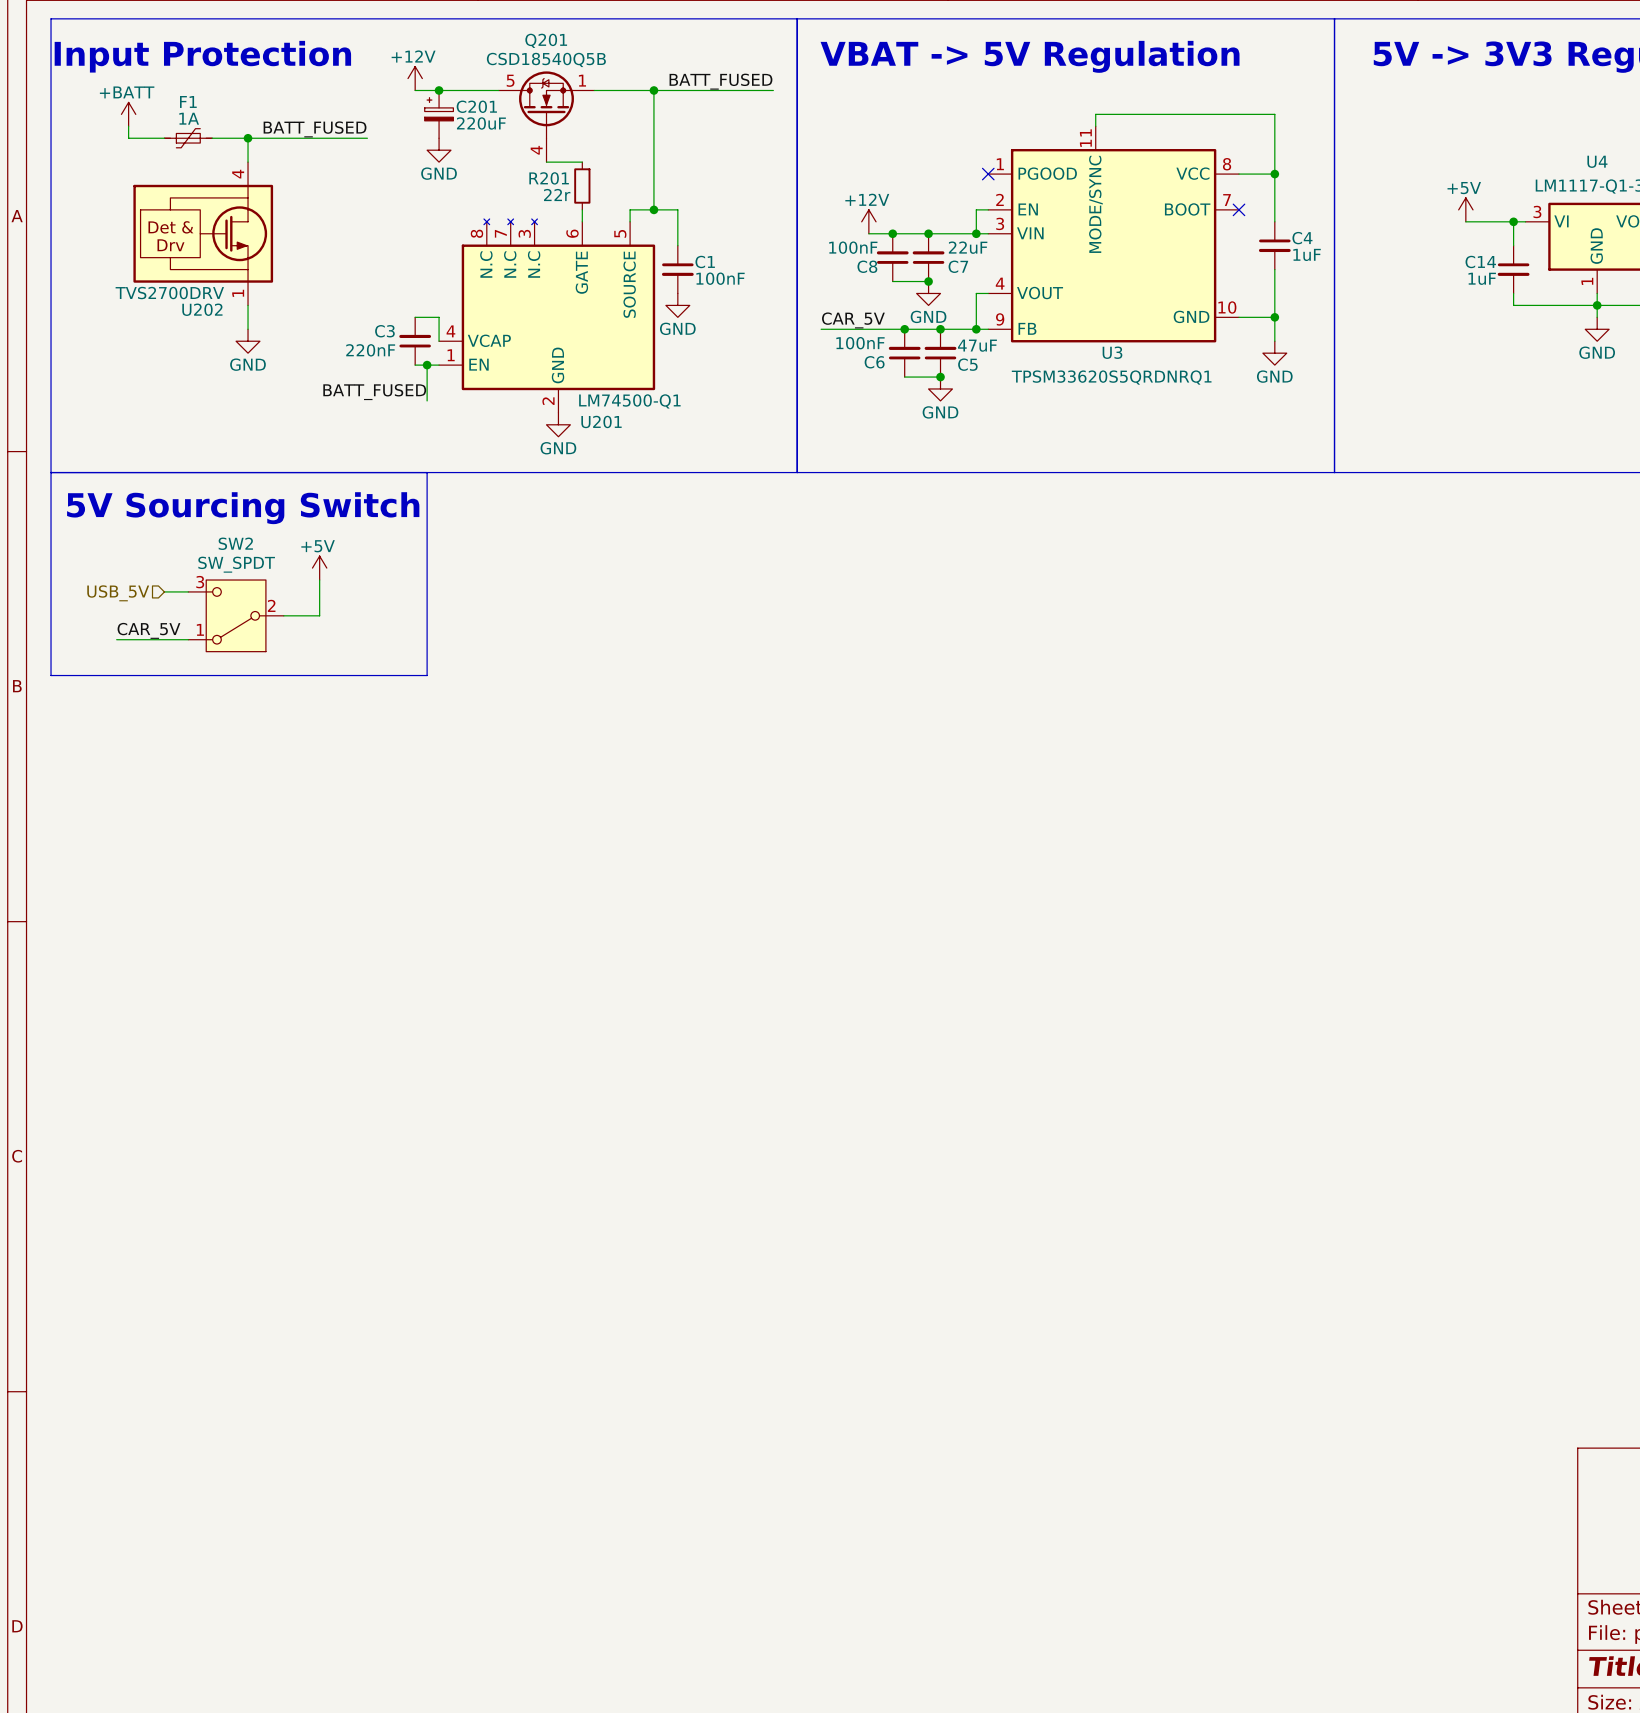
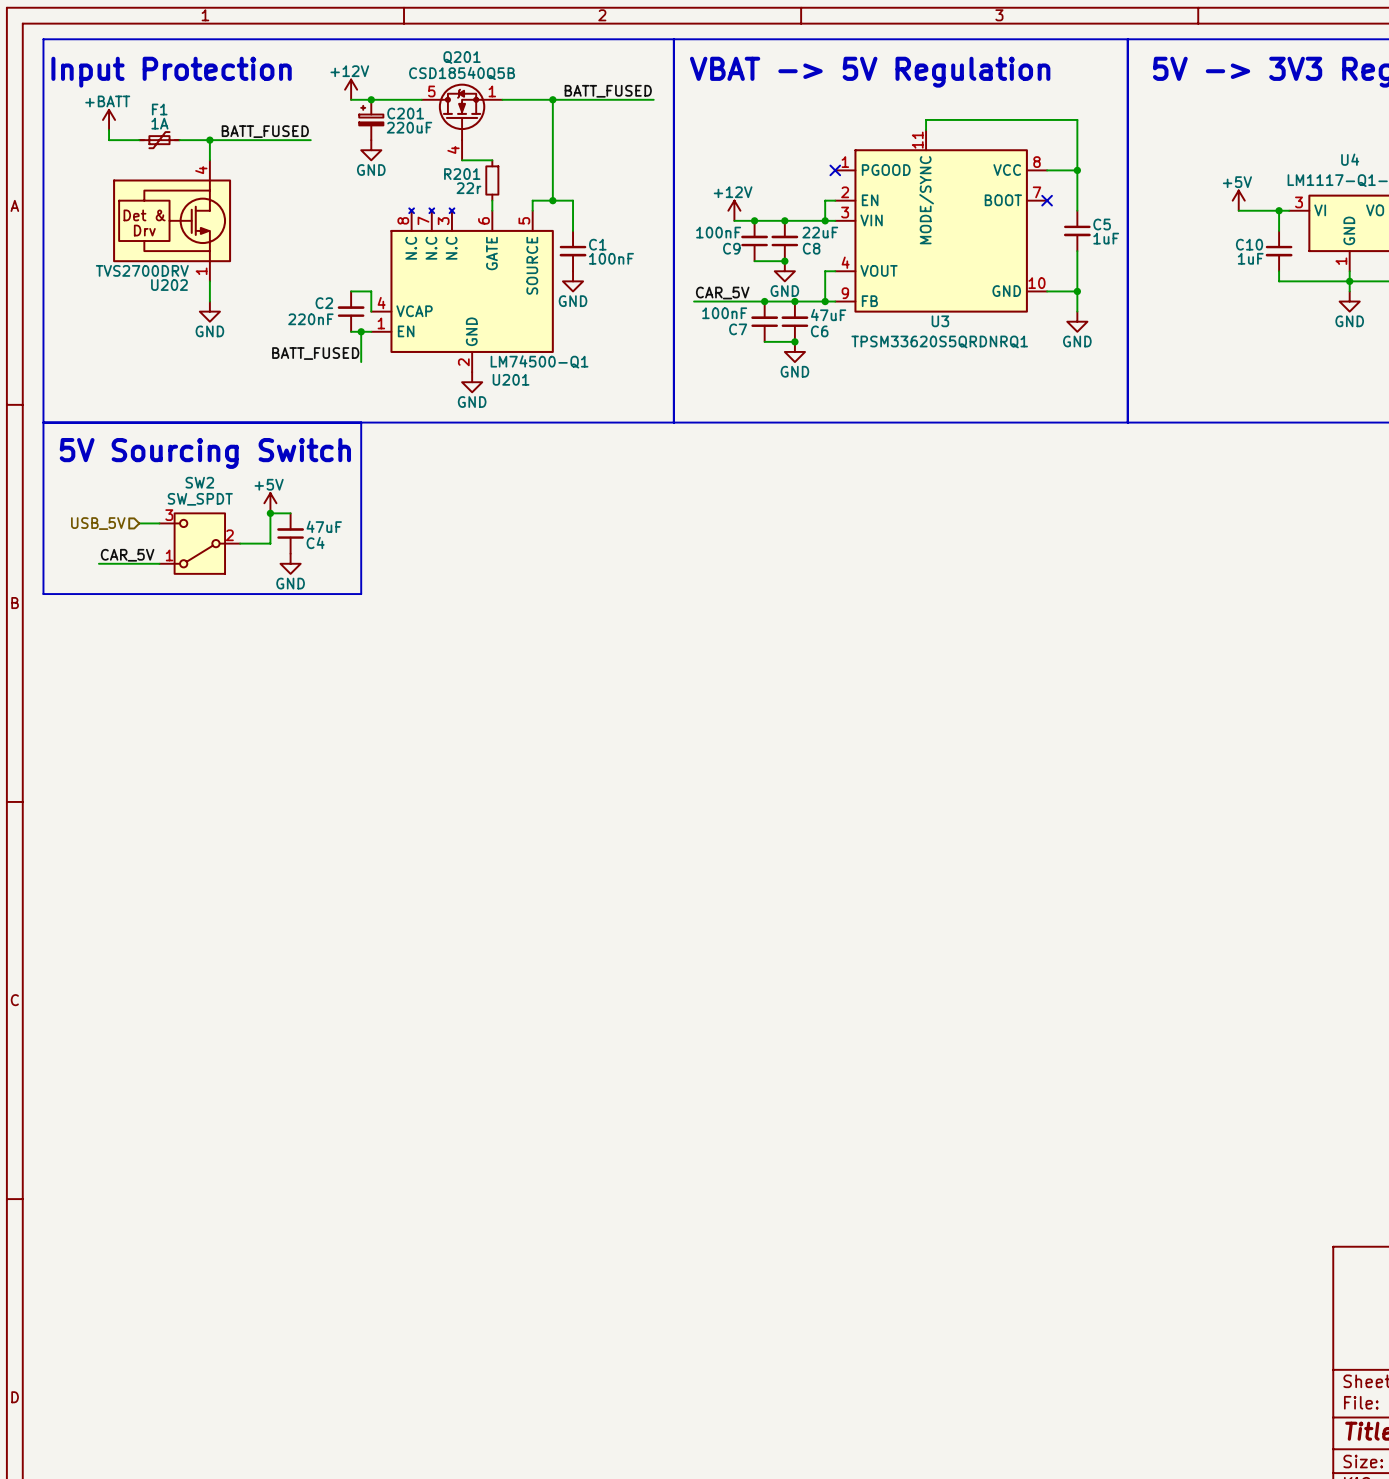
C4 name: C4 (1302, 238) -> C5 (1102, 224)
C14 name: C14 (1480, 261) -> C10 (1249, 244)
C8 name: C8 (867, 266) -> C9 (731, 248)
C7 name: C7 (958, 266) -> C8 (811, 248)
C3 name: C3 (384, 331) -> C2 (324, 303)
C6 name: C6 (874, 362) -> C7 (738, 329)
C5 name: C5 (967, 364) -> C6 (819, 331)
wire: none -> (270, 513) (290, 513)
junction: none -> (270, 513)
C4: none -> 47uF (290, 533)
power symbol: none -> GND (290, 563)

